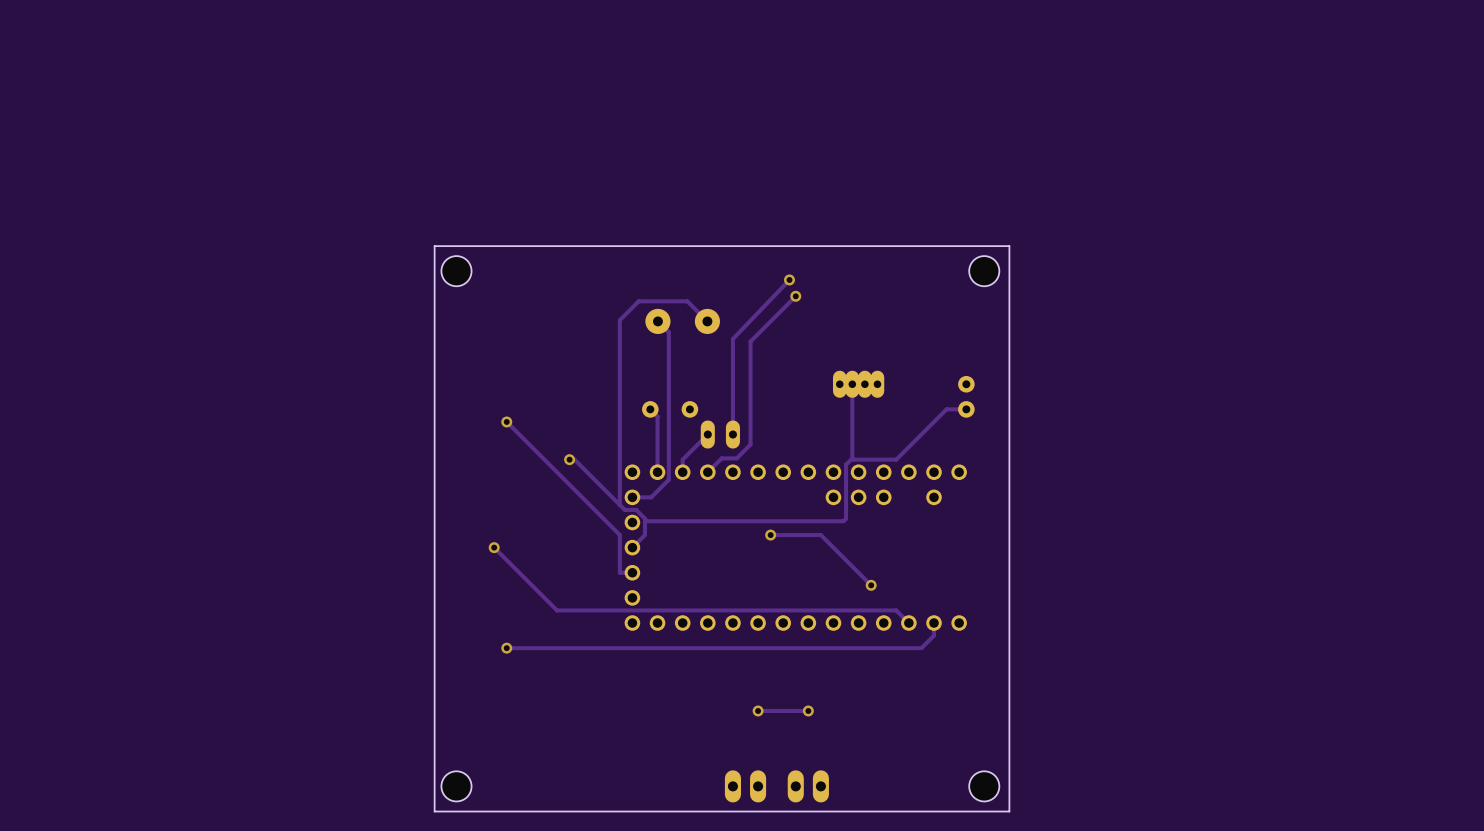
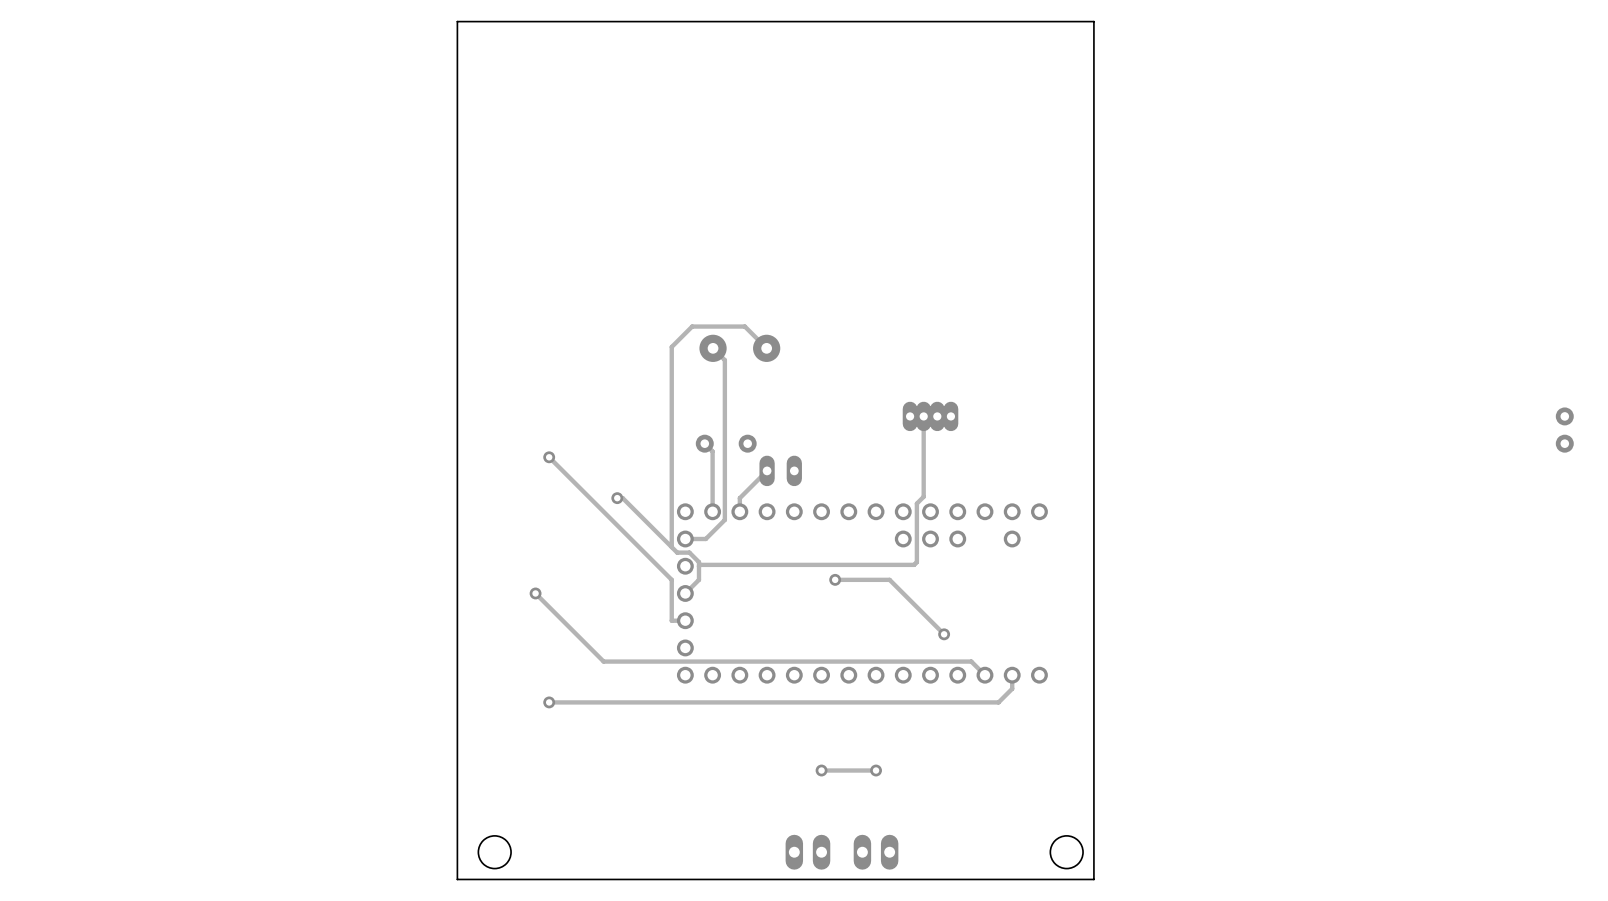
board edge: (1009, 246) (434, 246) (434, 811) -> (1093, 266) (1093, 21) (457, 21) (457, 879) (471, 879)
hole: (456, 271) -> none
hole: (984, 271) -> none
track: (789, 279) (732, 339) (732, 434) -> none
via: (789, 279) -> none
track: (795, 296) (750, 341) (750, 444) (736, 458) (721, 458) (707, 472) -> none
via: (795, 296) -> none
part: (966, 396) -> none
part: none -> (1564, 430)
track: (966, 409) (946, 409) (896, 459) (852, 458) -> none

